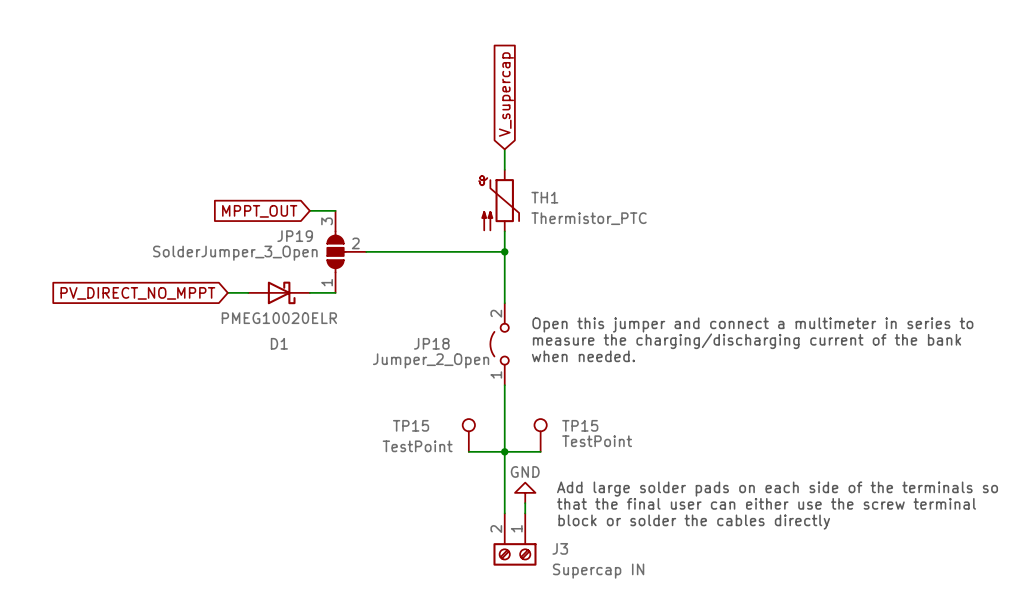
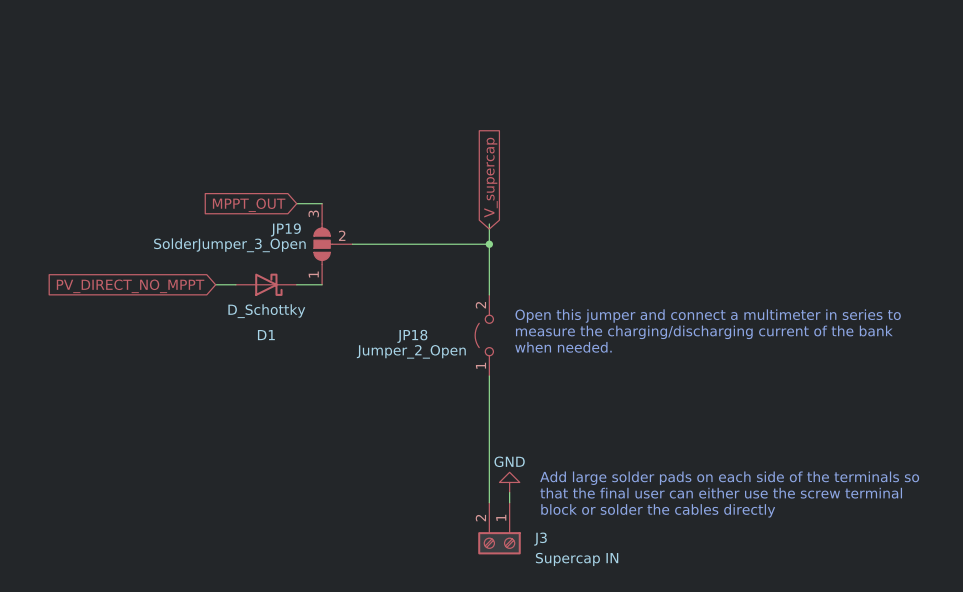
global label position: V_supercap (506, 94) -> V_supercap (490, 177)
wire: (504, 149) (504, 169) -> none
TH1: Thermistor_PTC (499, 200) -> none
D1 value: PMEG10020ELR (279, 318) -> D_Schottky (266, 311)
TP15: TestPoint (468, 435) -> none
TP15: TestPoint (540, 435) -> none
wire: (468, 451) (540, 451) -> none
junction: (504, 451) -> none

